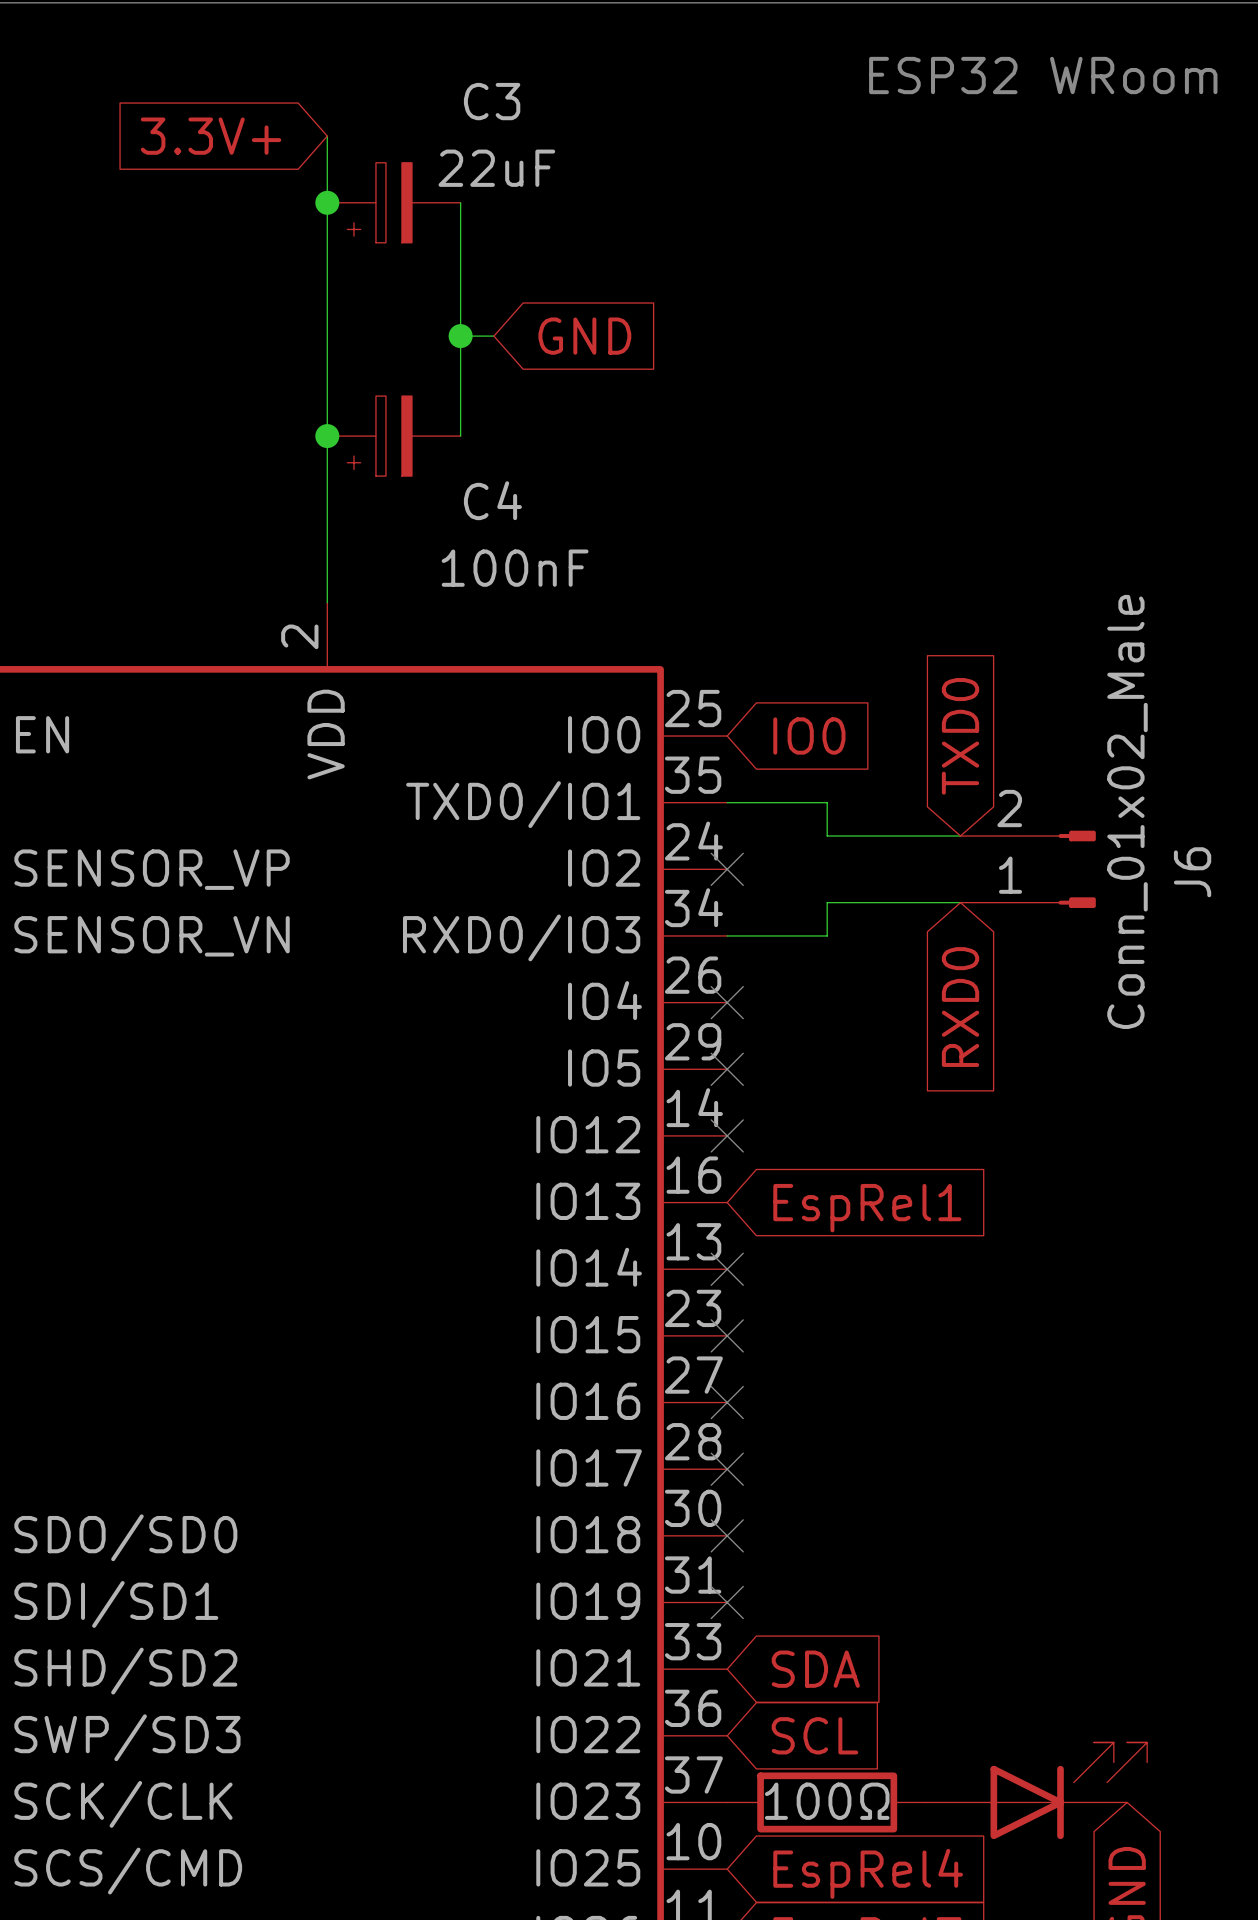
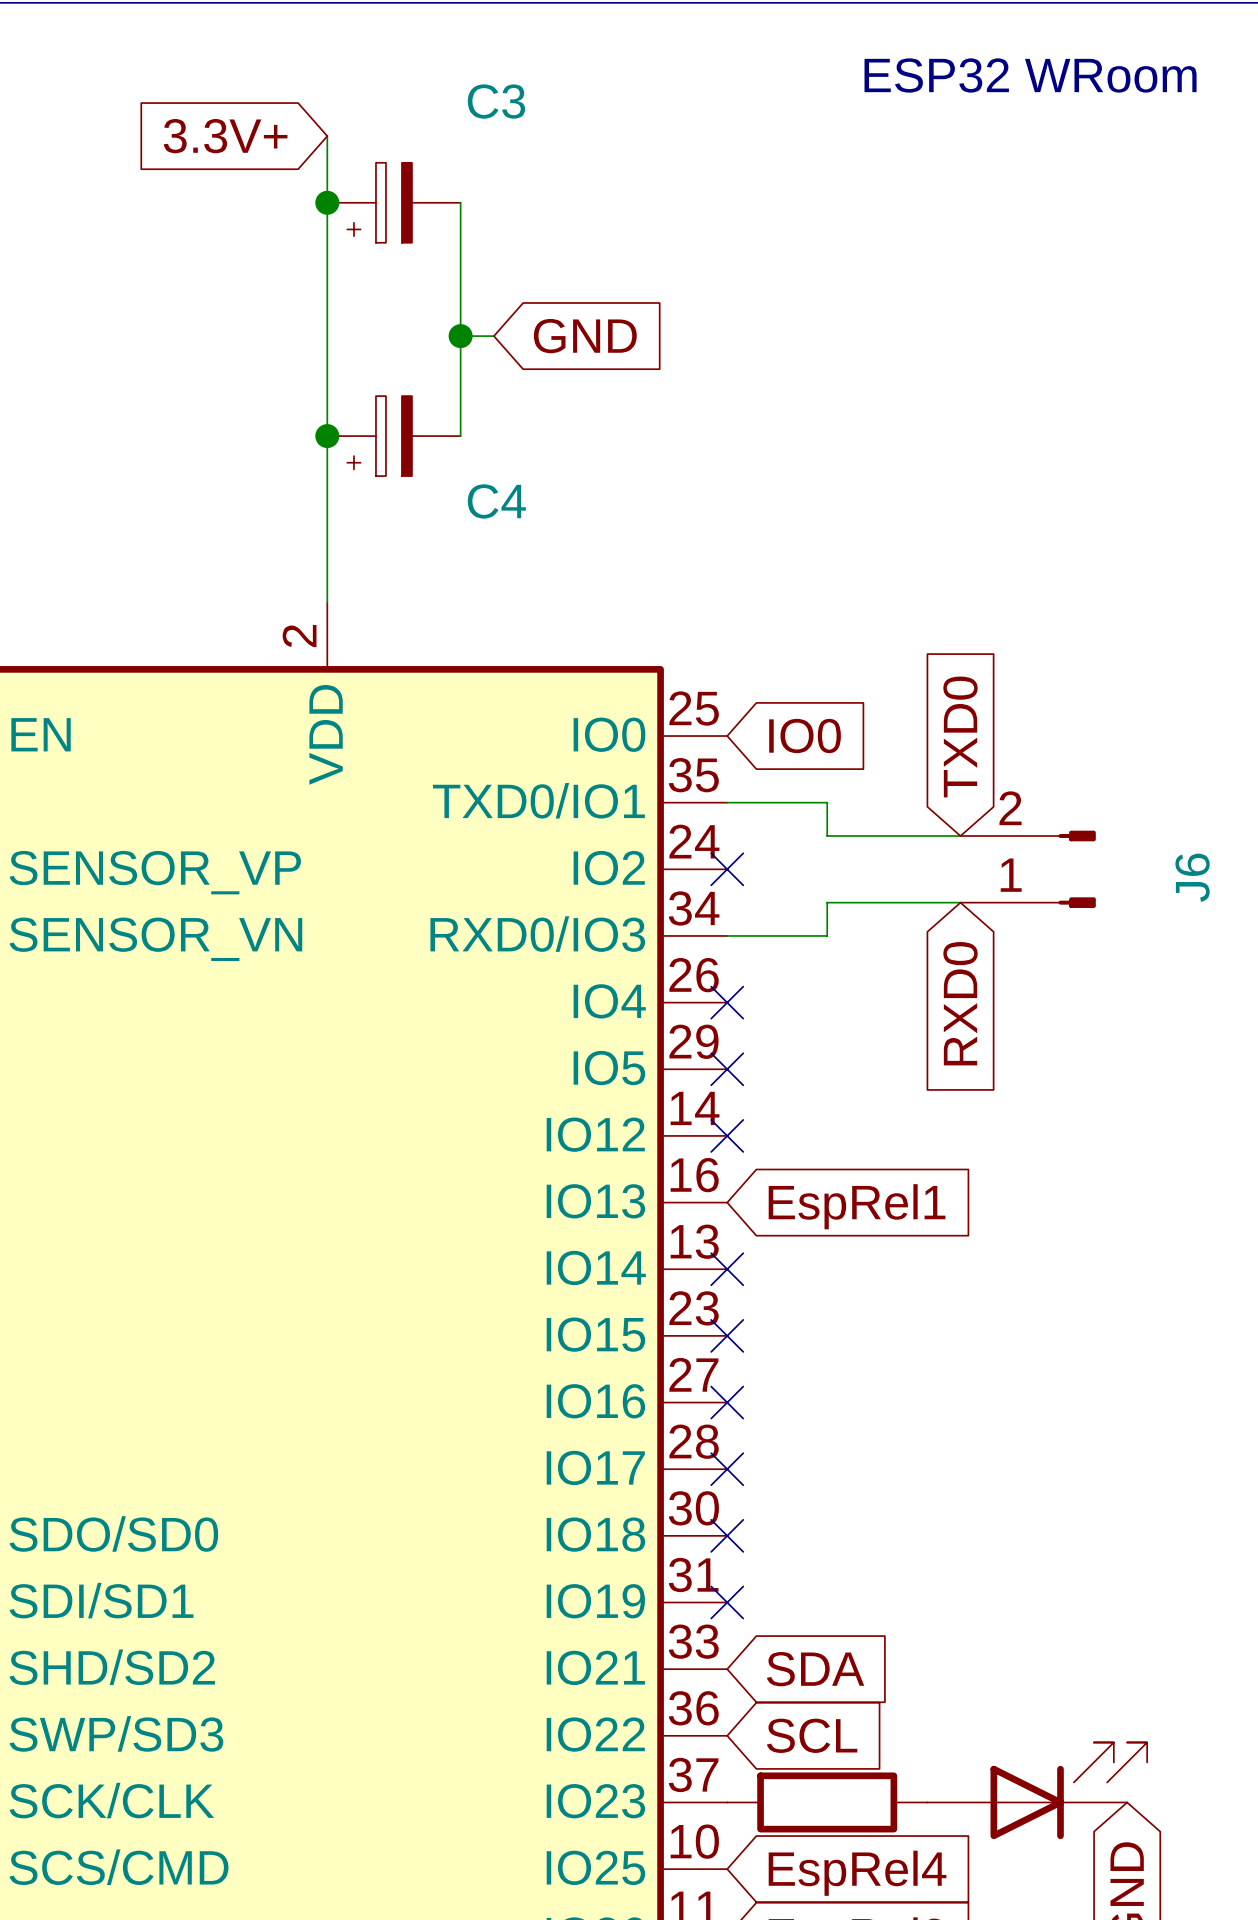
C3 value: 22uF (496, 168) -> none
C4 value: 100nF (515, 568) -> none
J6 value: Conn_01x02_Male (1127, 811) -> none
part value: 100Ω (827, 1801) -> none

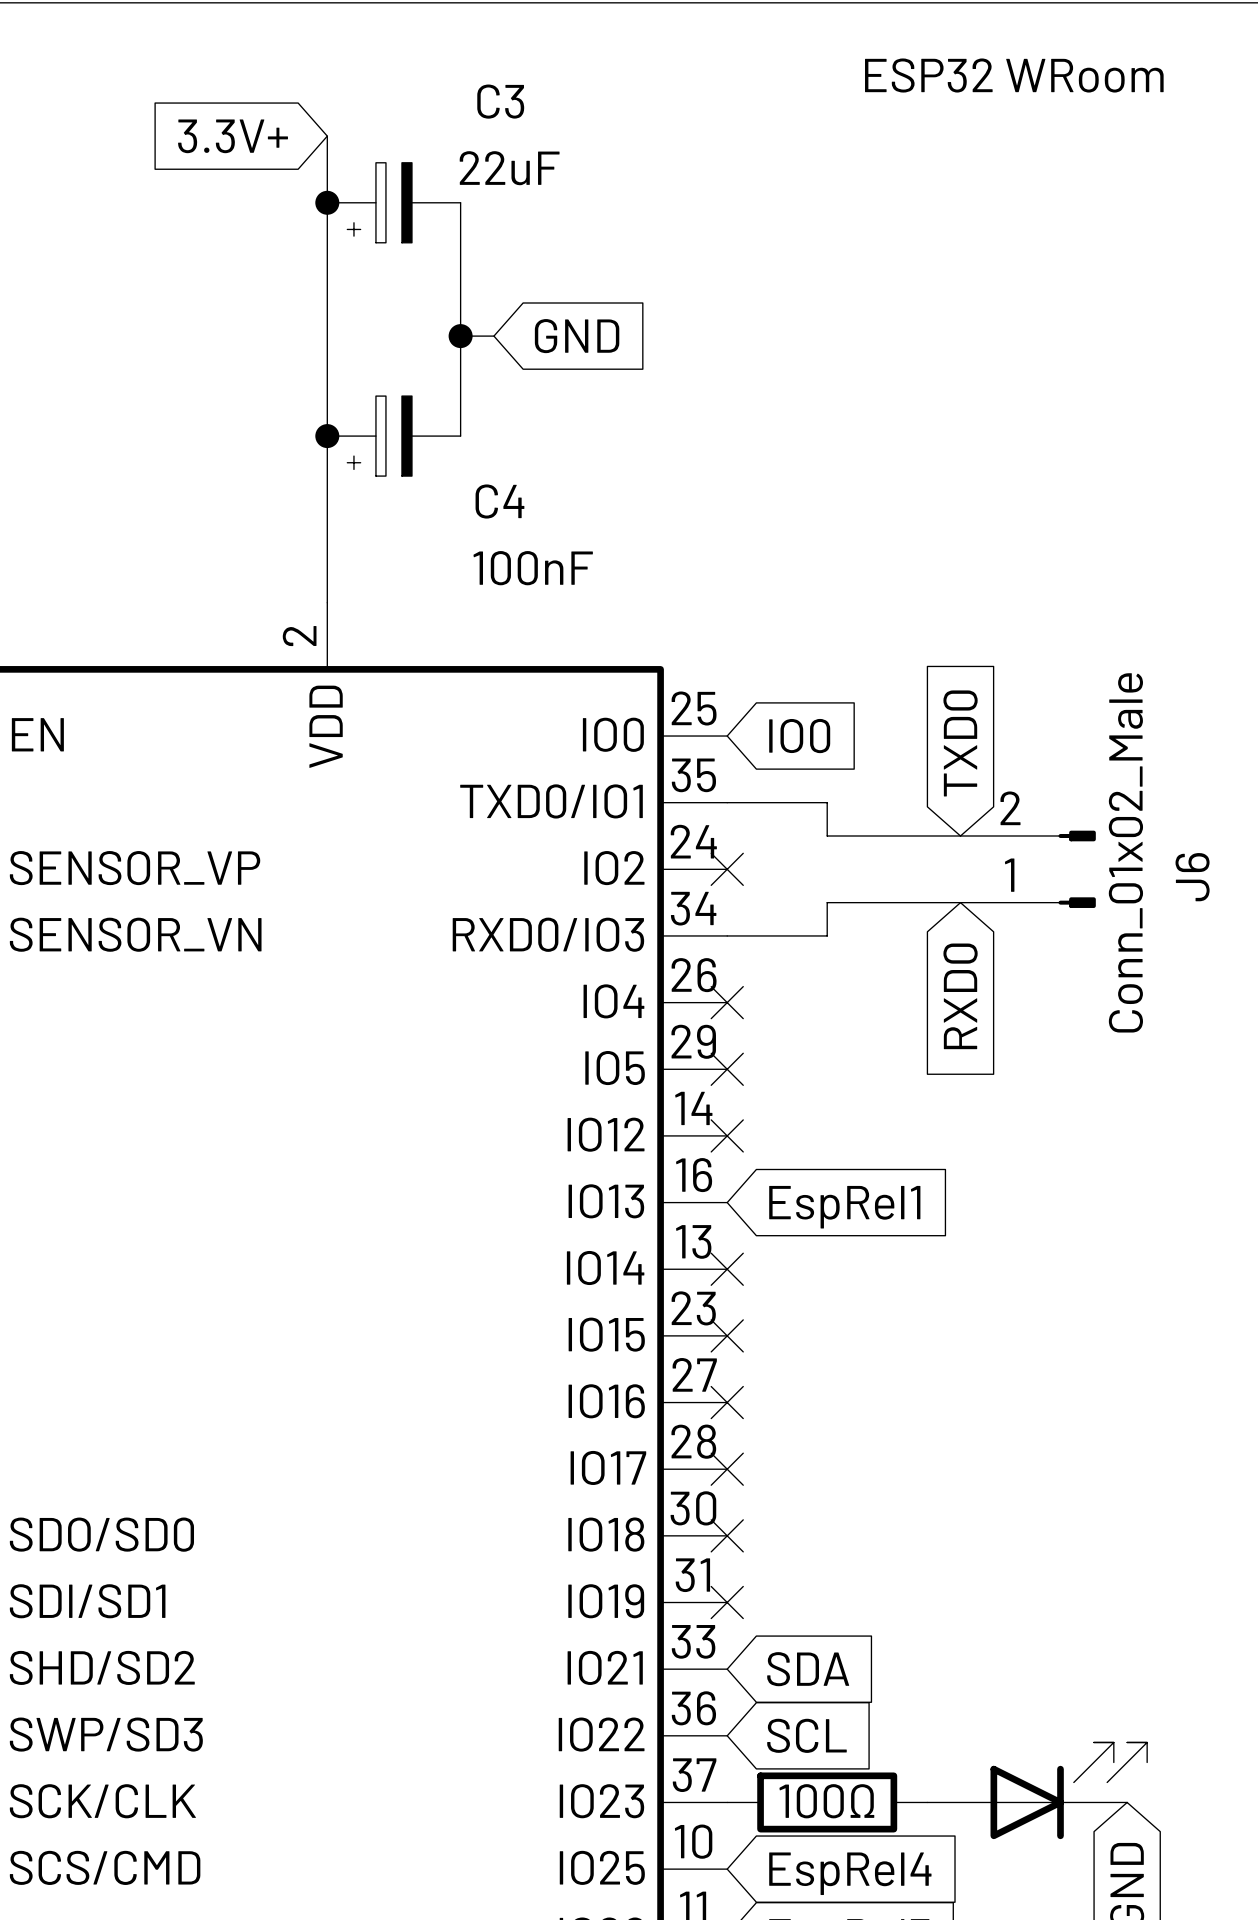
C3 value: none -> 22uF (509, 168)
C4 value: none -> 100nF (533, 568)
J6 value: none -> Conn_01x02_Male (1125, 852)
part value: none -> 100Ω (826, 1801)

